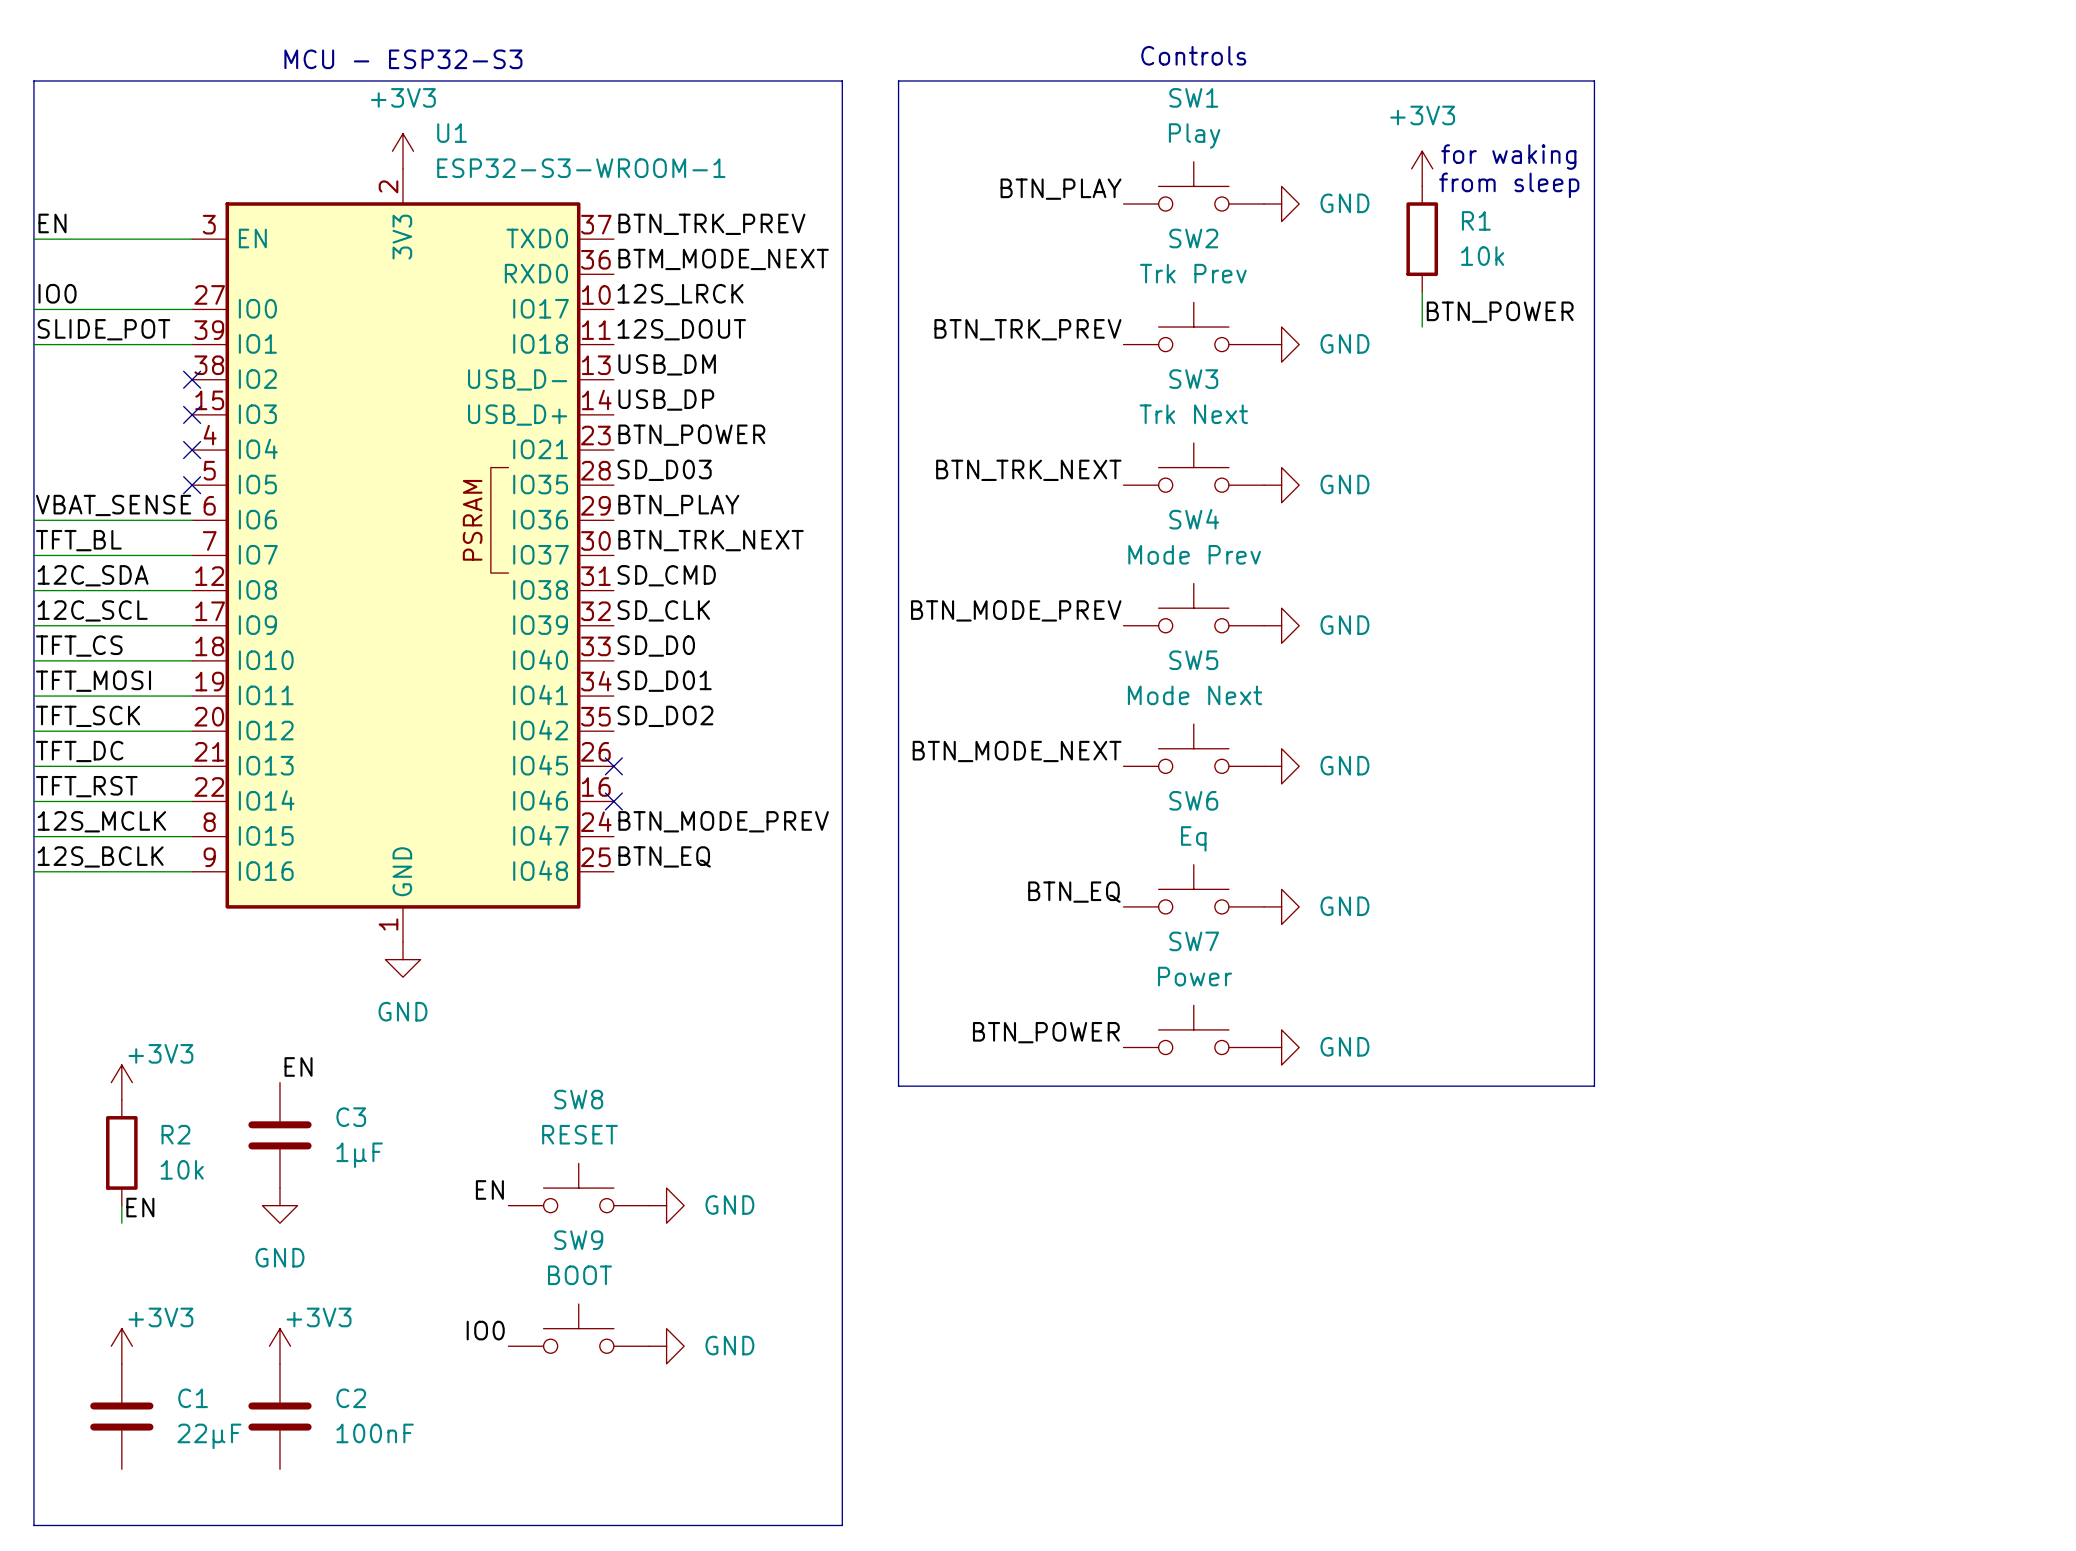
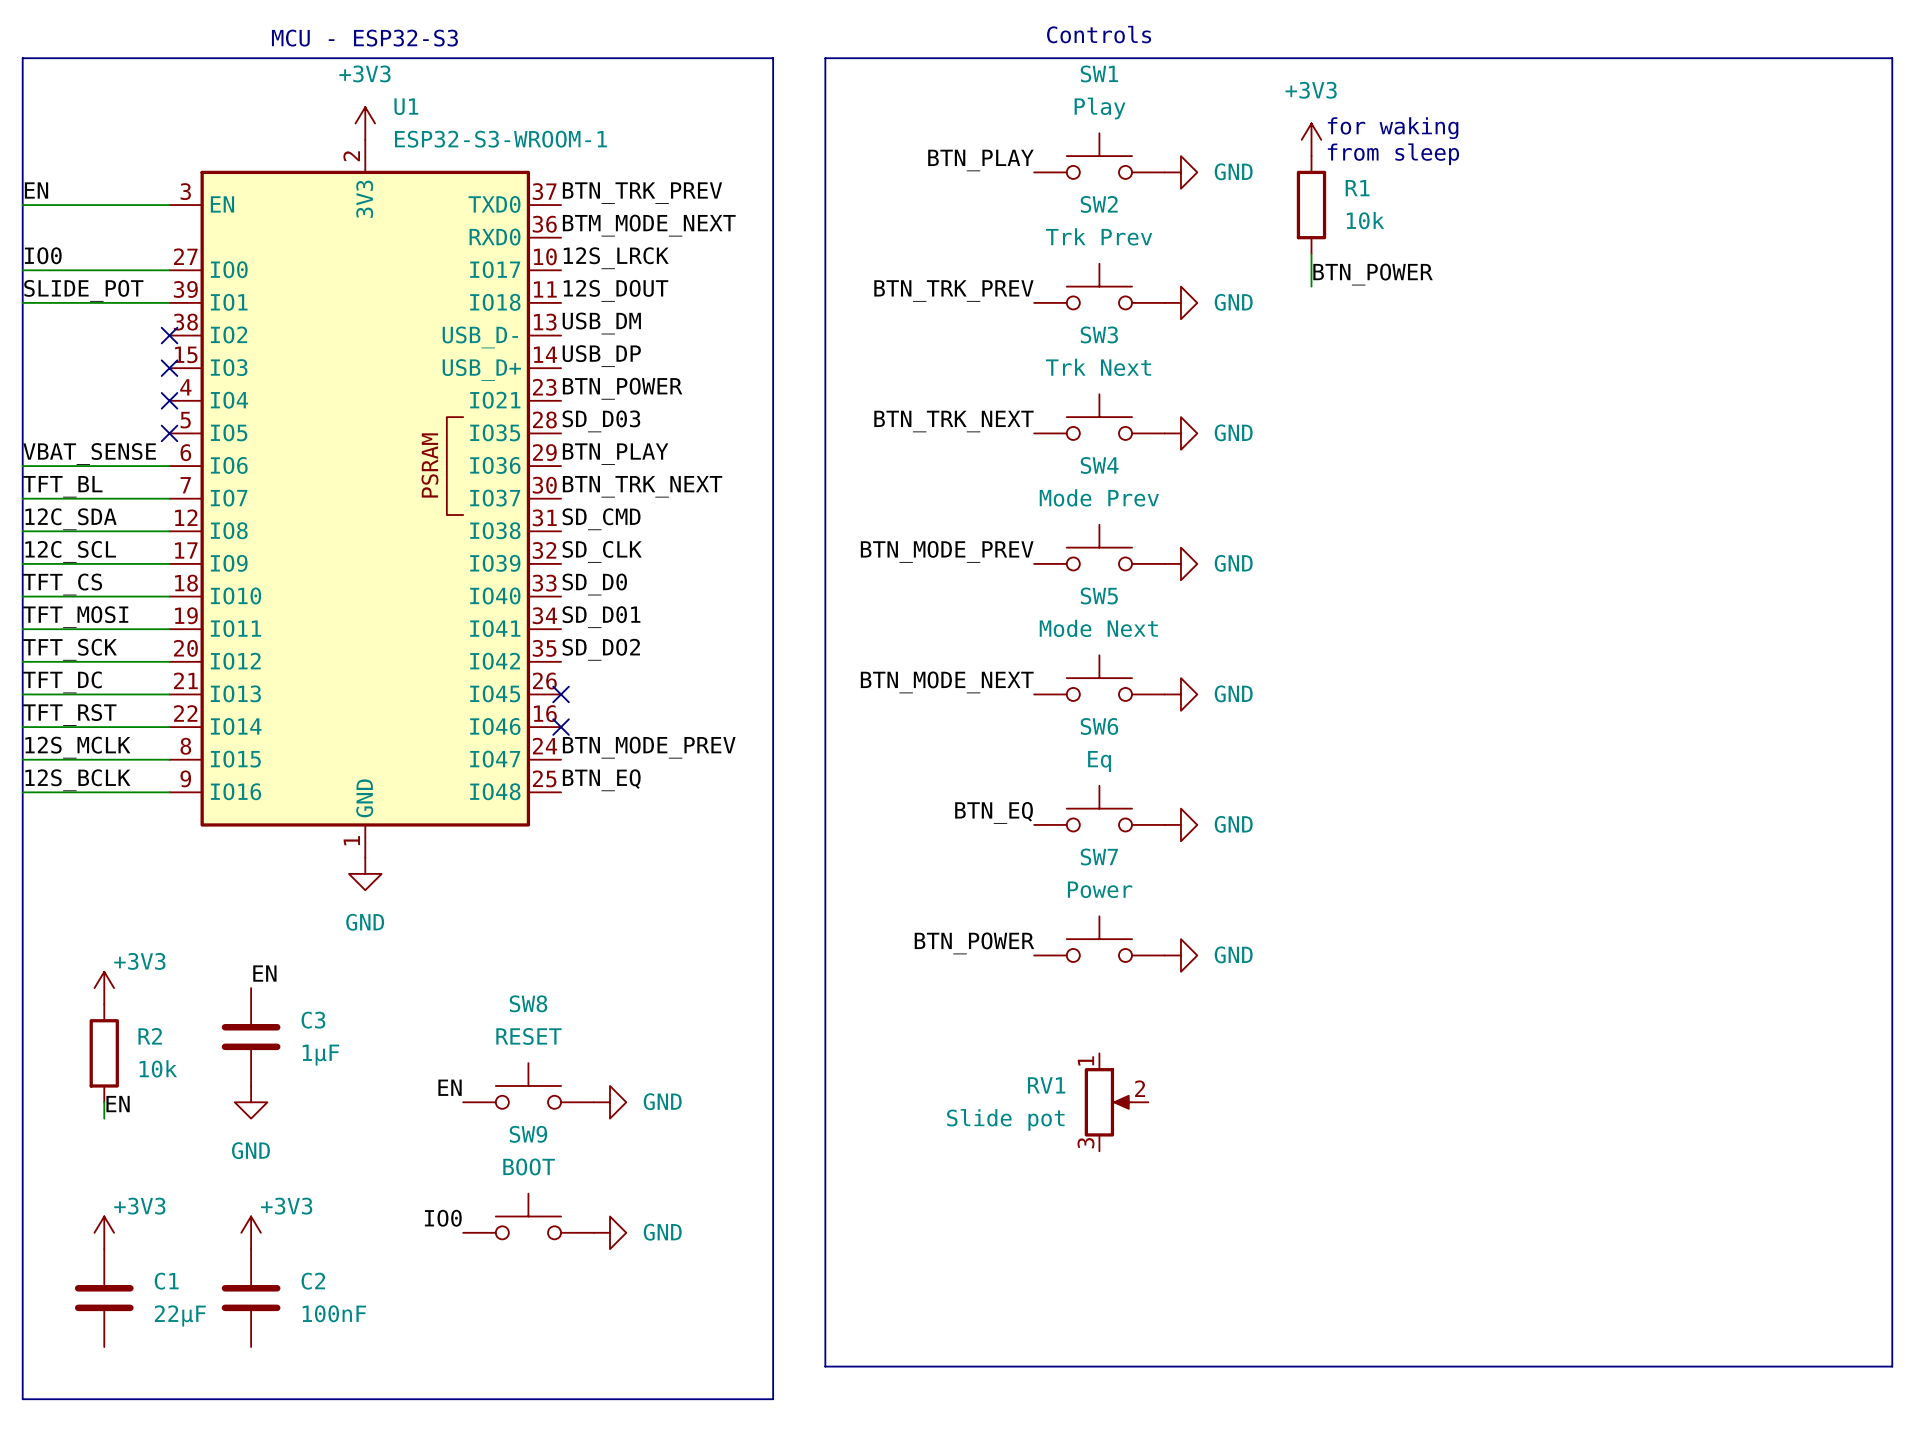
line: (1594, 80) (1594, 1086) (898, 1086) -> (1471, 58) (1892, 58) (1892, 1366) (825, 1366) (825, 991)
RV1: none -> Slide pot (1116, 1102)

